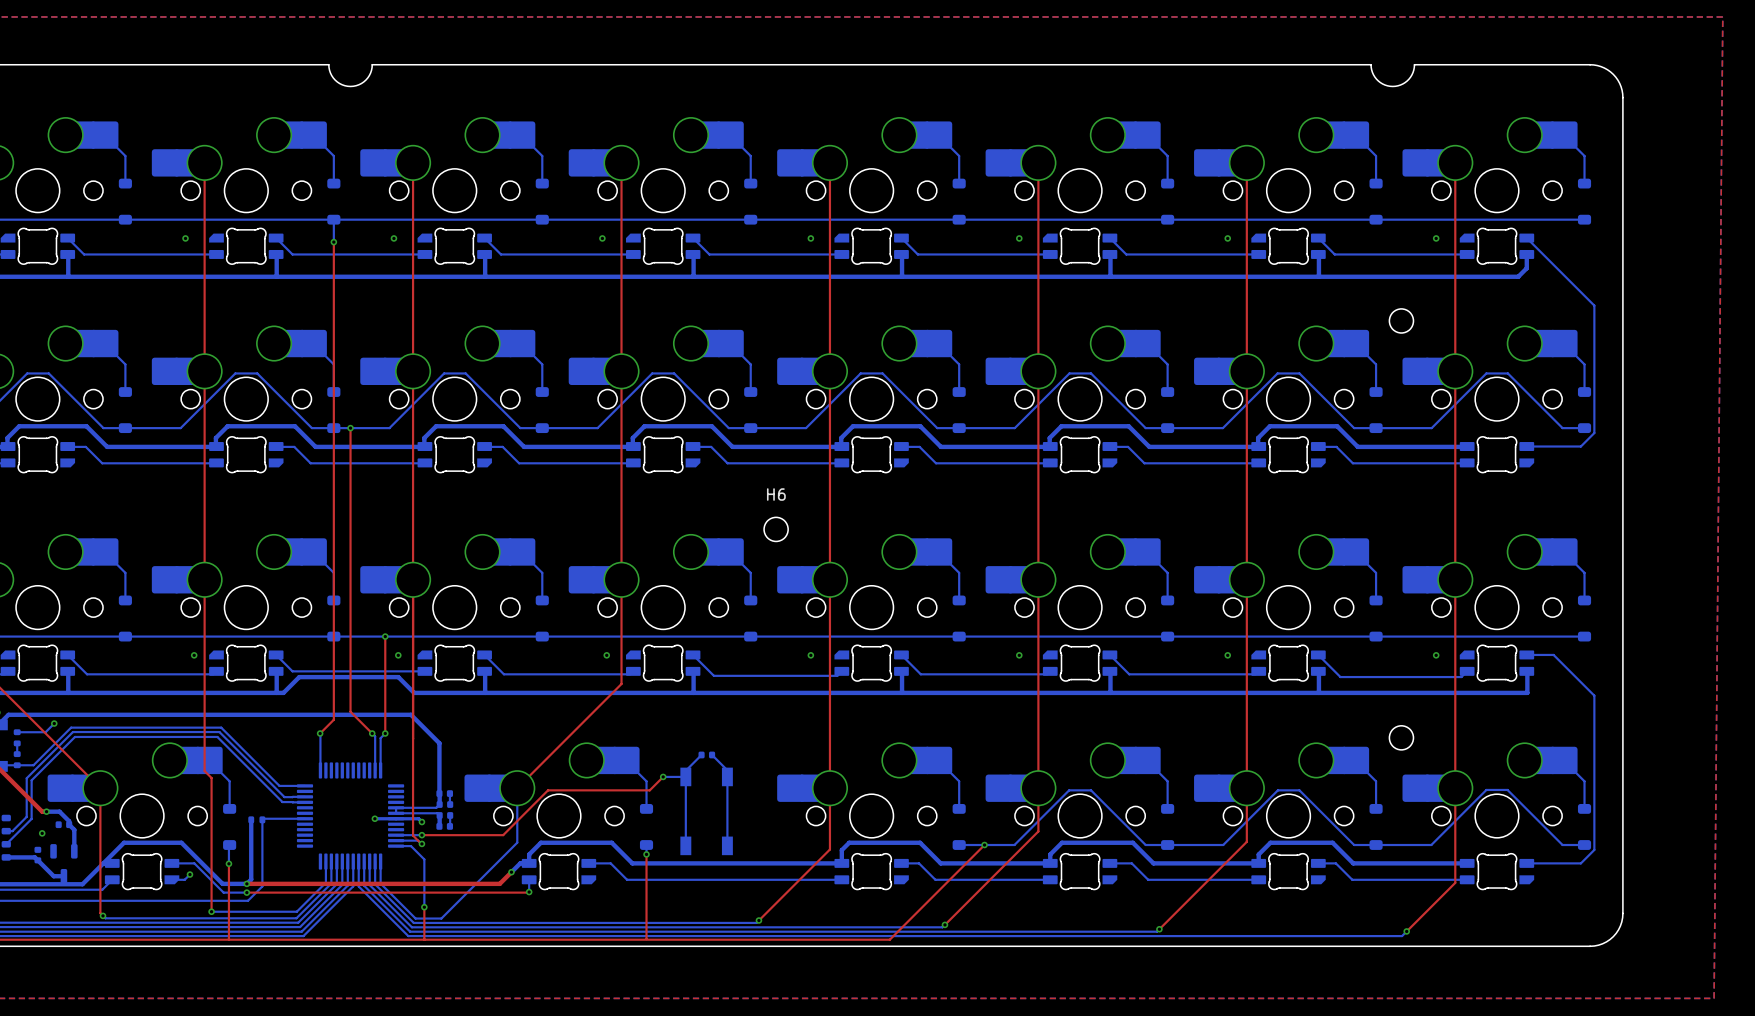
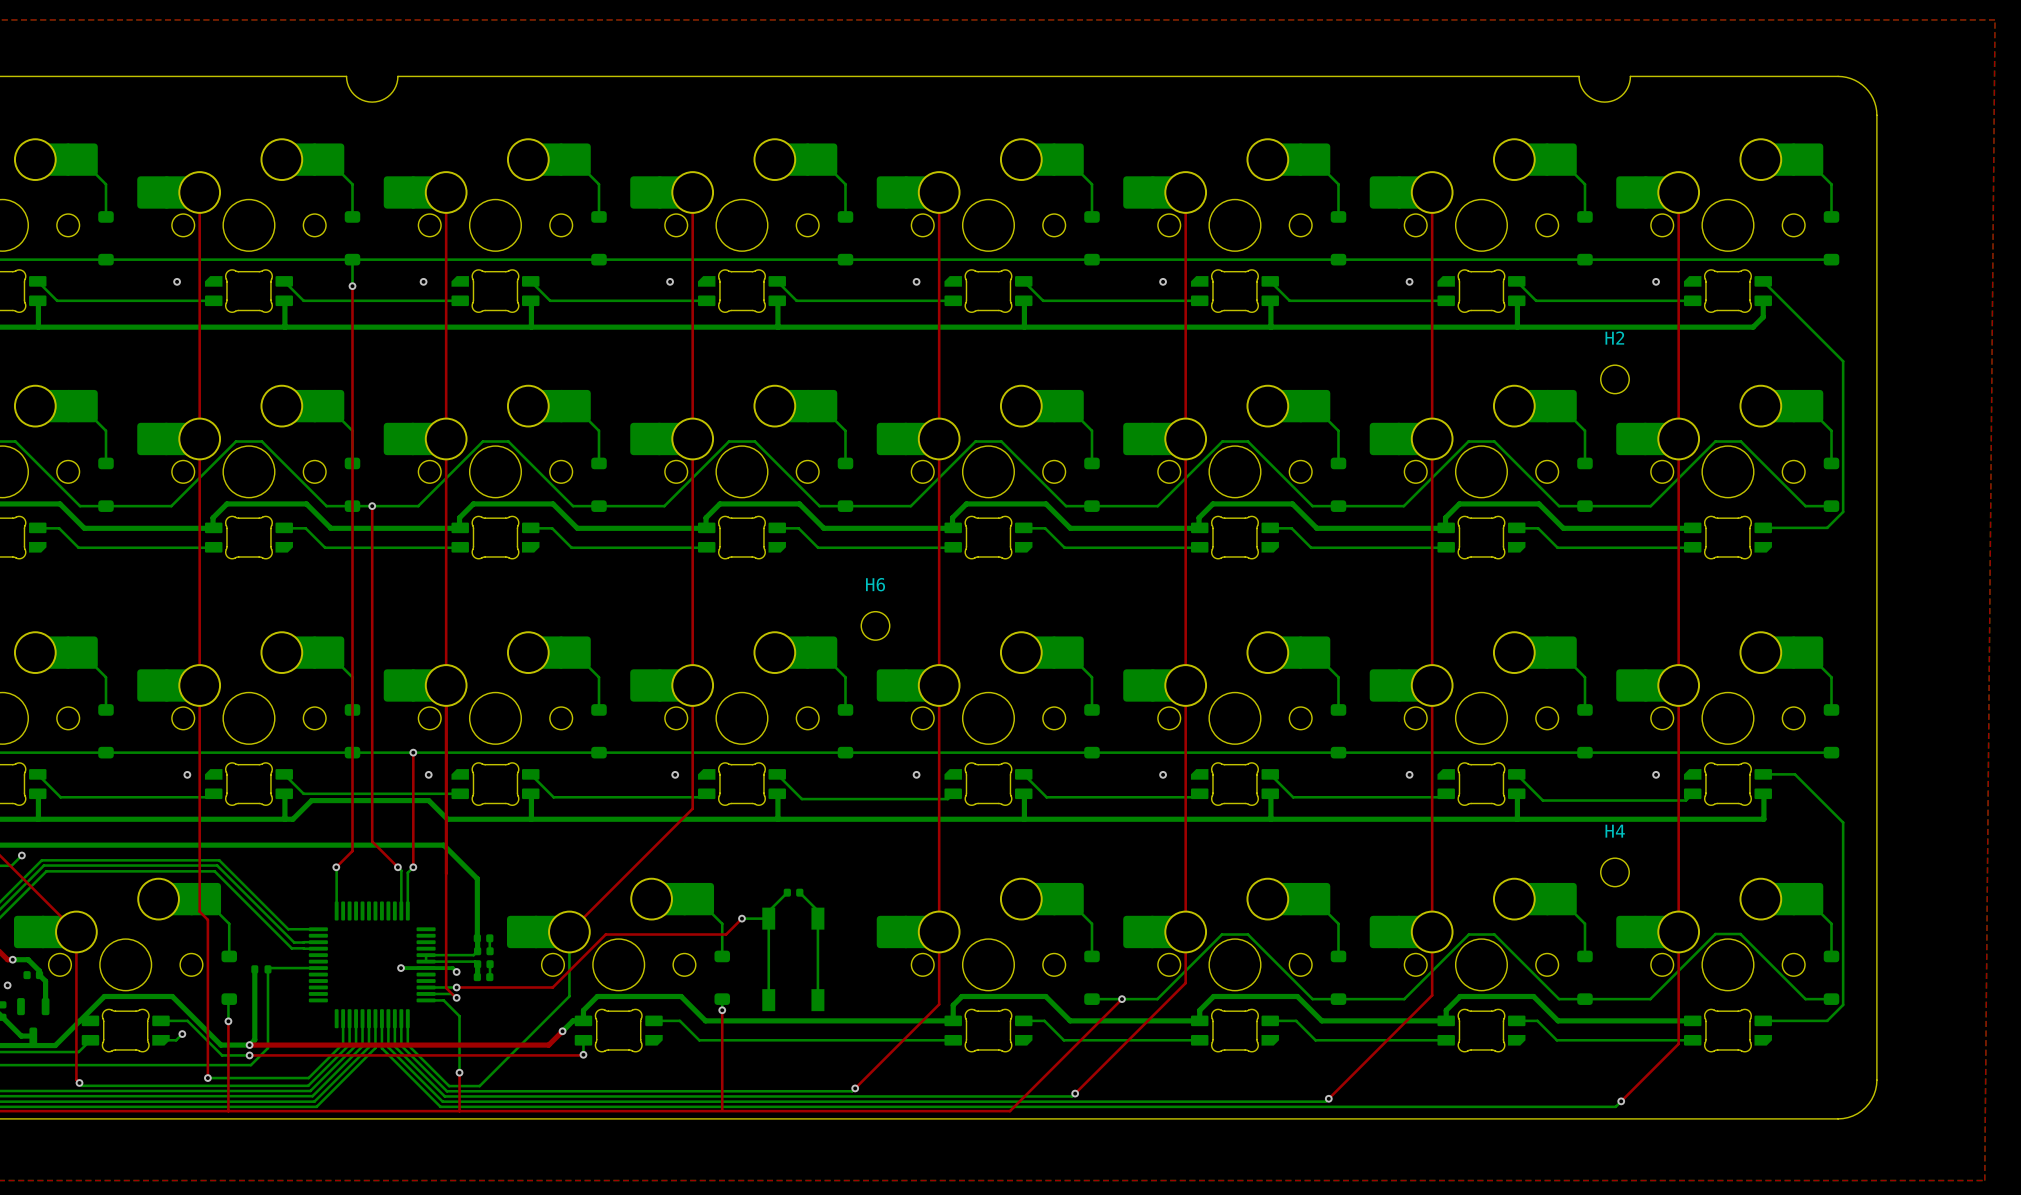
H2 name: none -> H2 (1614, 338)
H4 name: none -> H4 (1615, 831)

